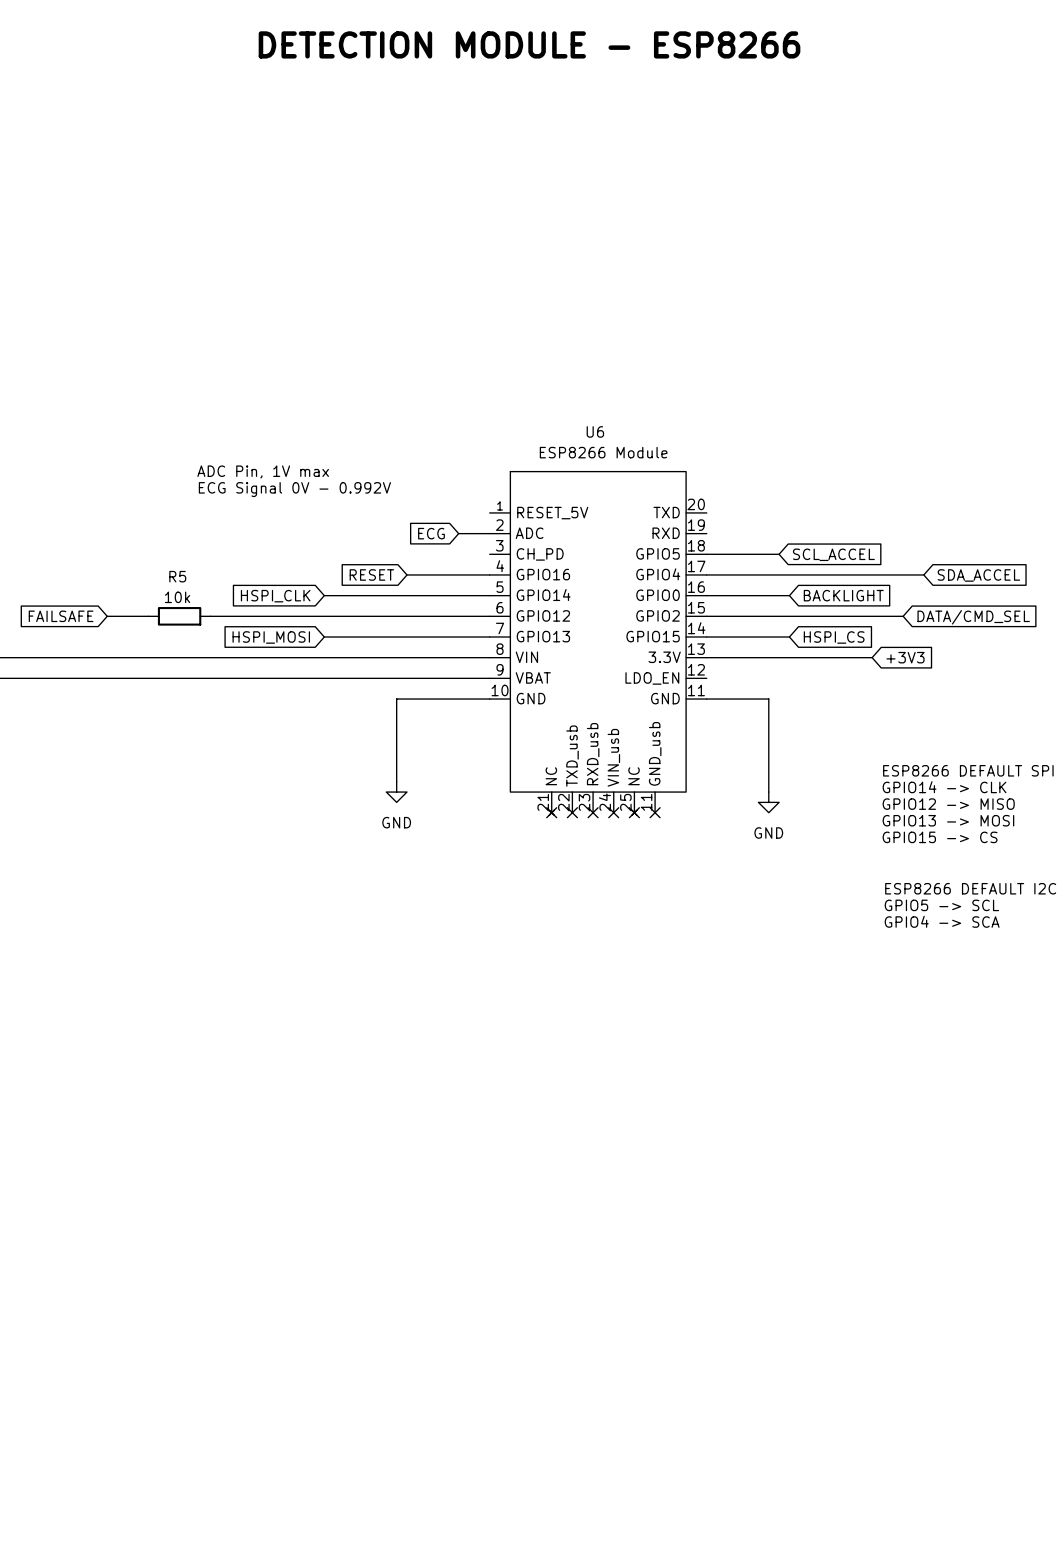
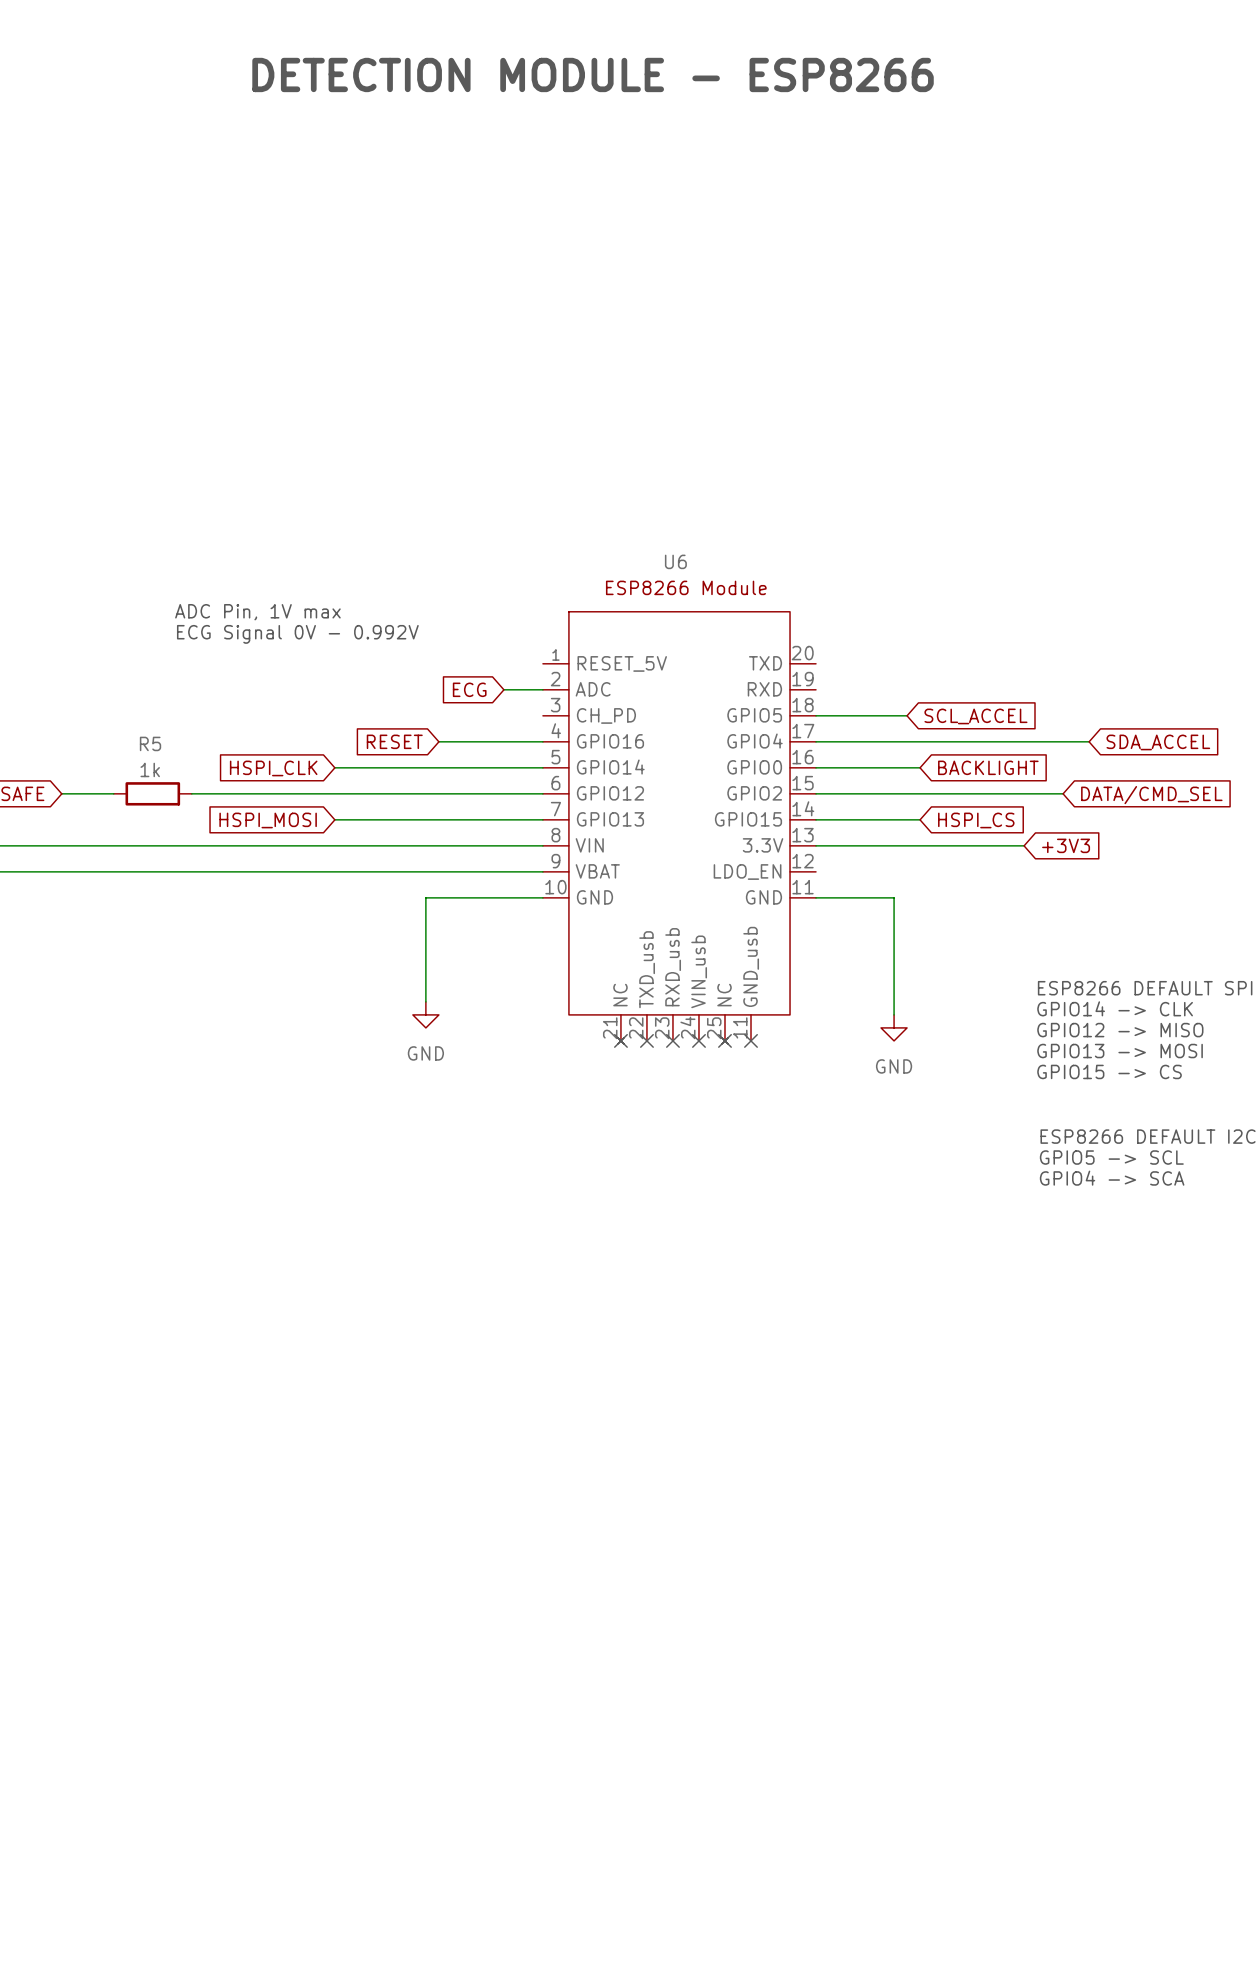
R5 value: 10k (177, 597) -> 1k (150, 769)

